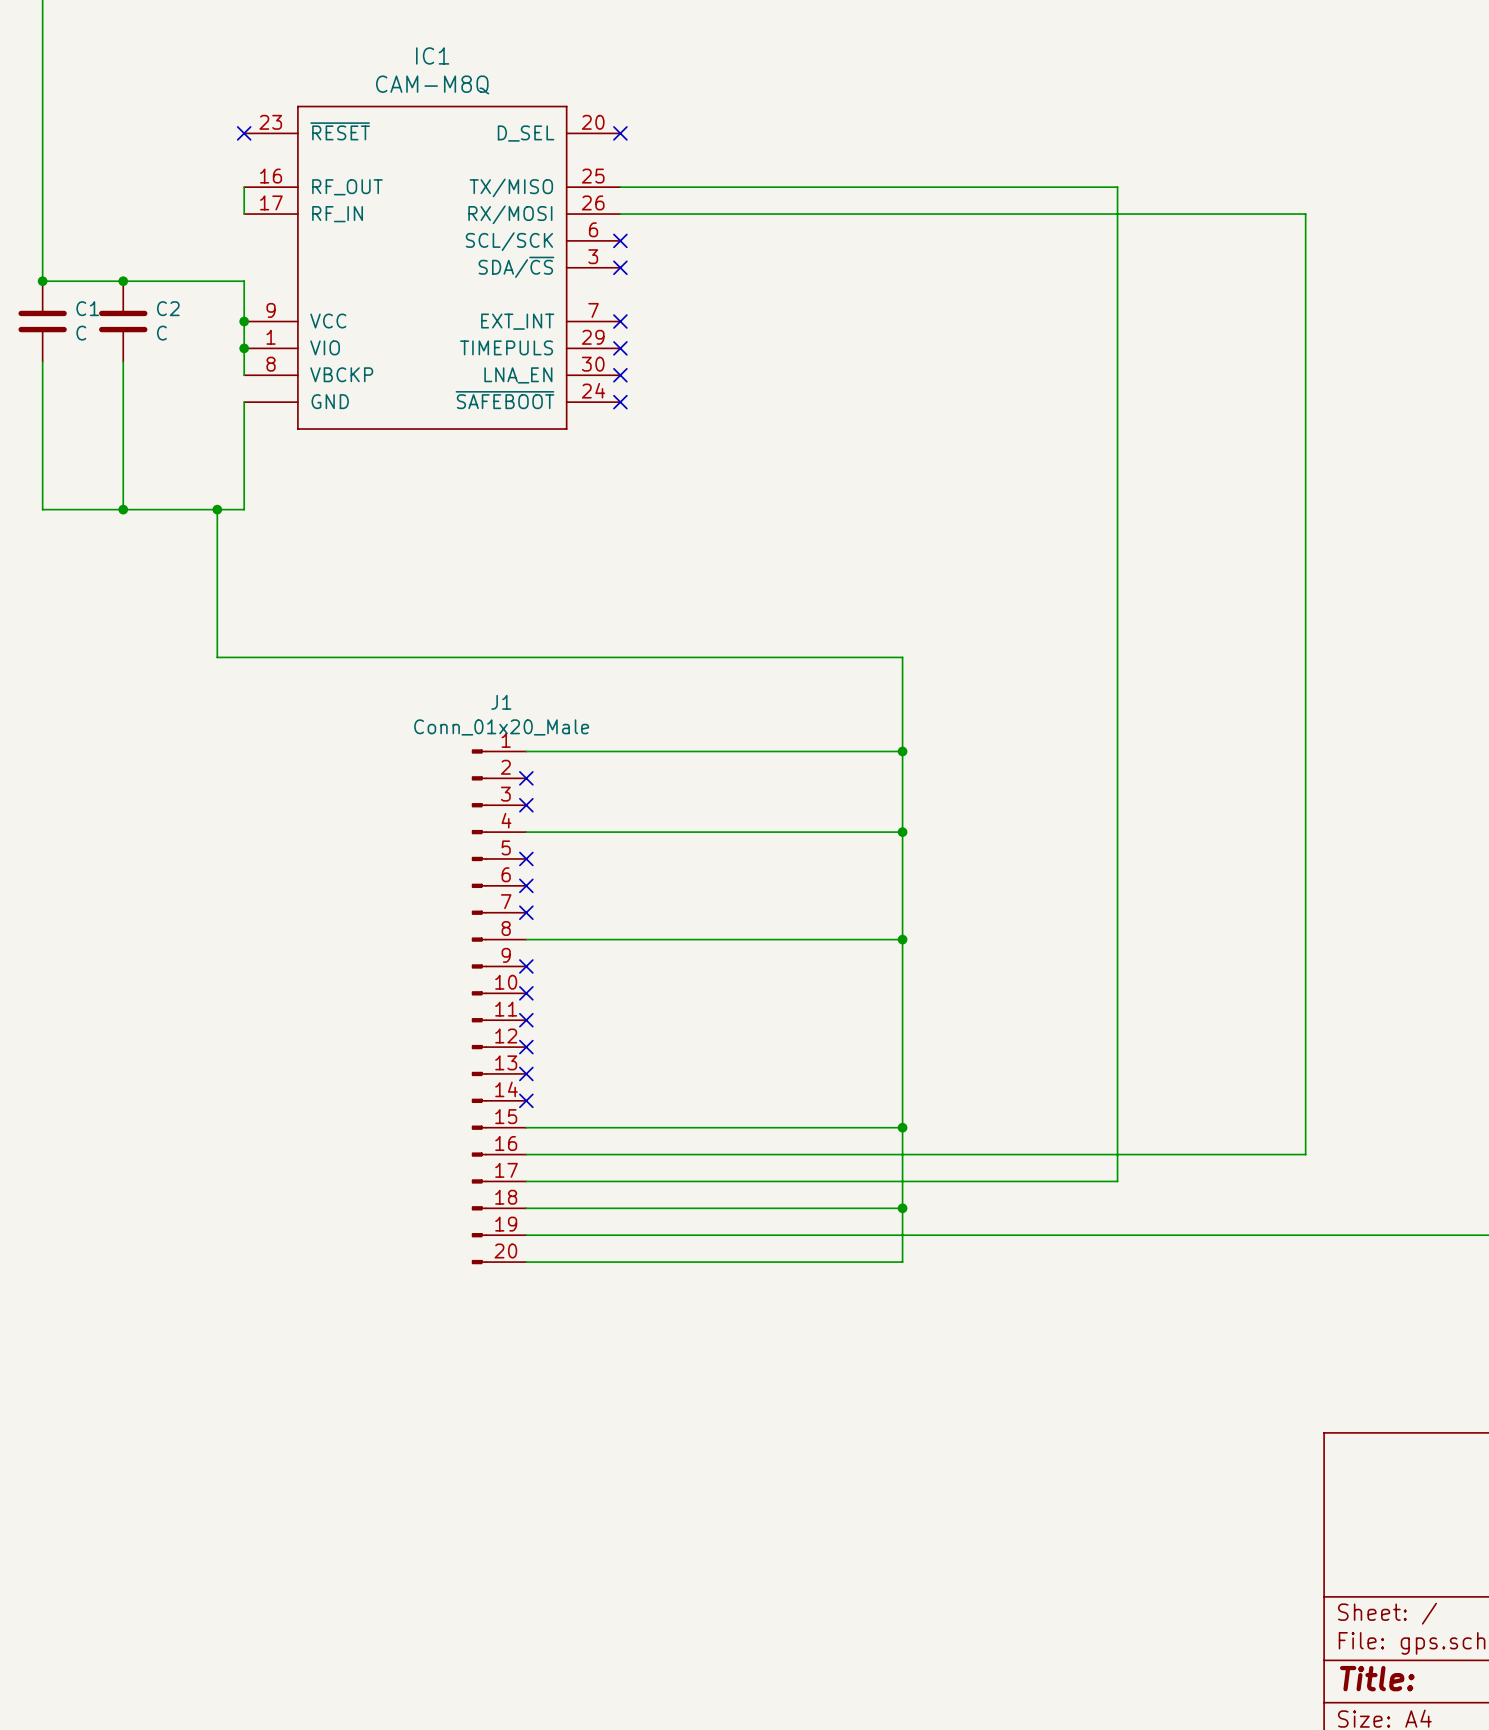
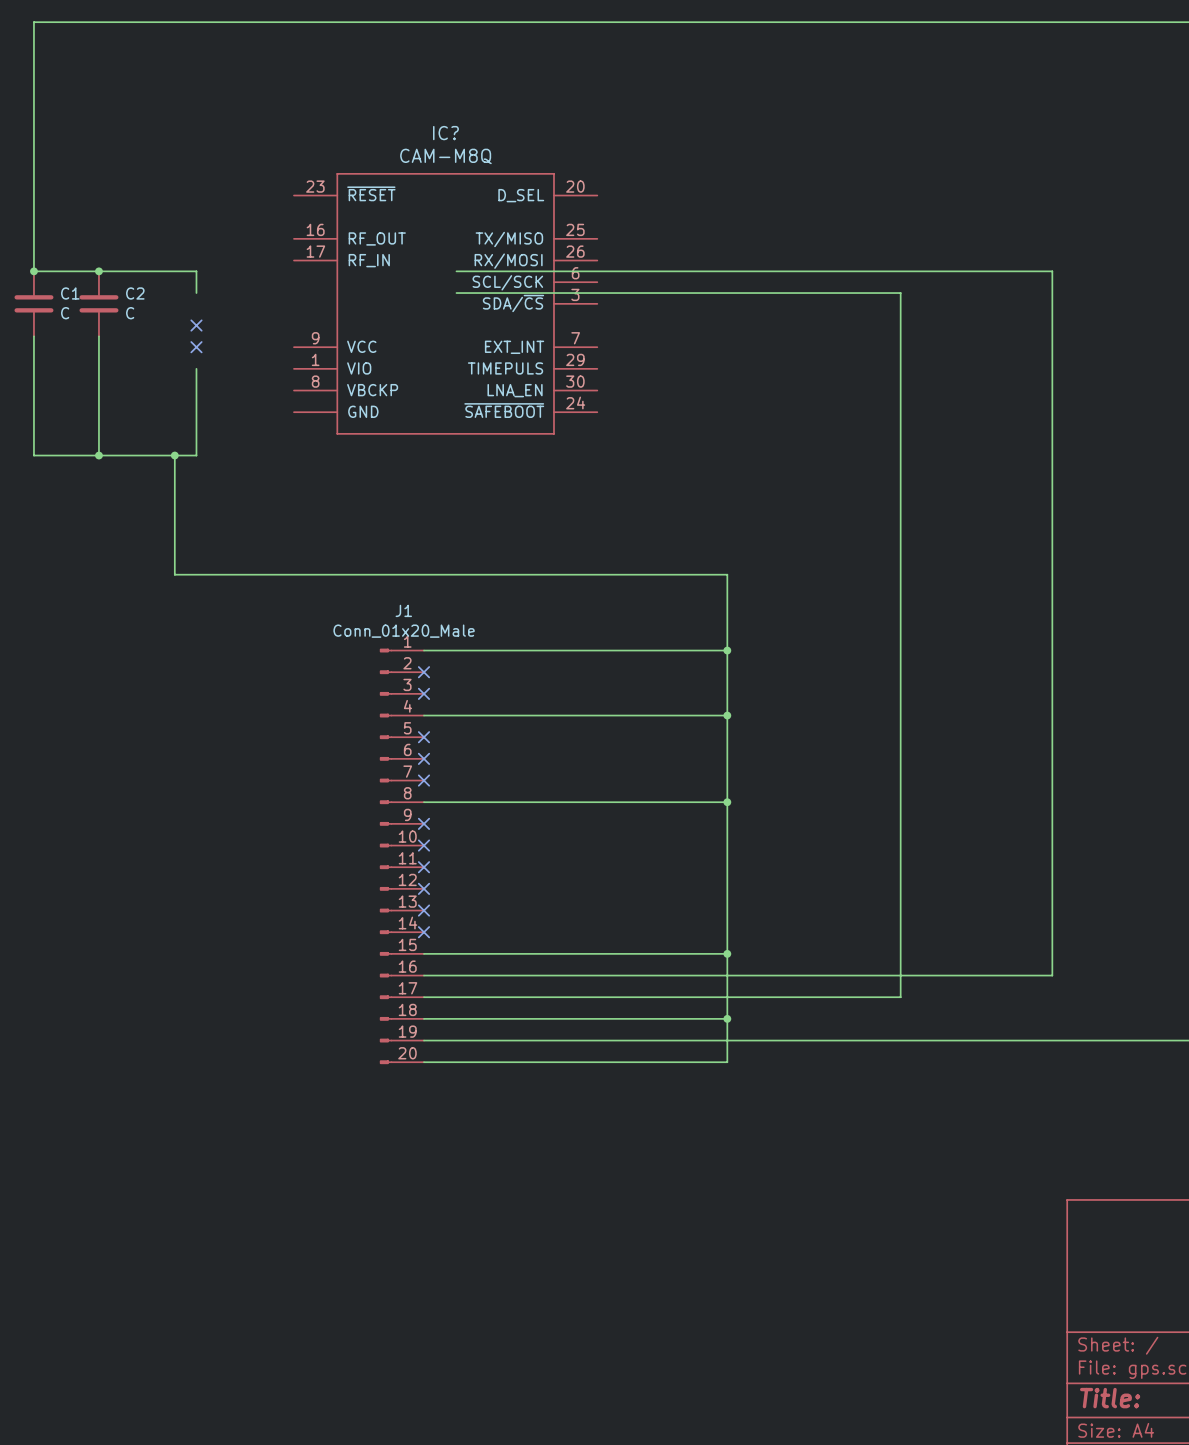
no-connect mark: (244, 133) -> none
no-connect mark: (620, 133) -> none
wire: (244, 187) (244, 214) -> none
wire: (620, 187) (1117, 187) (1117, 308) -> (456, 293) (900, 293)
wire: (620, 214) (1305, 214) (1305, 281) -> (456, 271) (1052, 271)
no-connect mark: (620, 240) -> none
IC1: CAM-M8Q (432, 267) -> none
no-connect mark: (620, 267) -> none
wire: (244, 308) (244, 375) -> none
junction: (244, 321) -> none
IC?: none -> CAM-M8Q (445, 303)
no-connect mark: (620, 321) -> none
no-connect mark: none -> (196, 325)
junction: (244, 348) -> none
no-connect mark: (620, 348) -> none
no-connect mark: none -> (196, 347)
no-connect mark: (620, 375) -> none
no-connect mark: (620, 402) -> none

